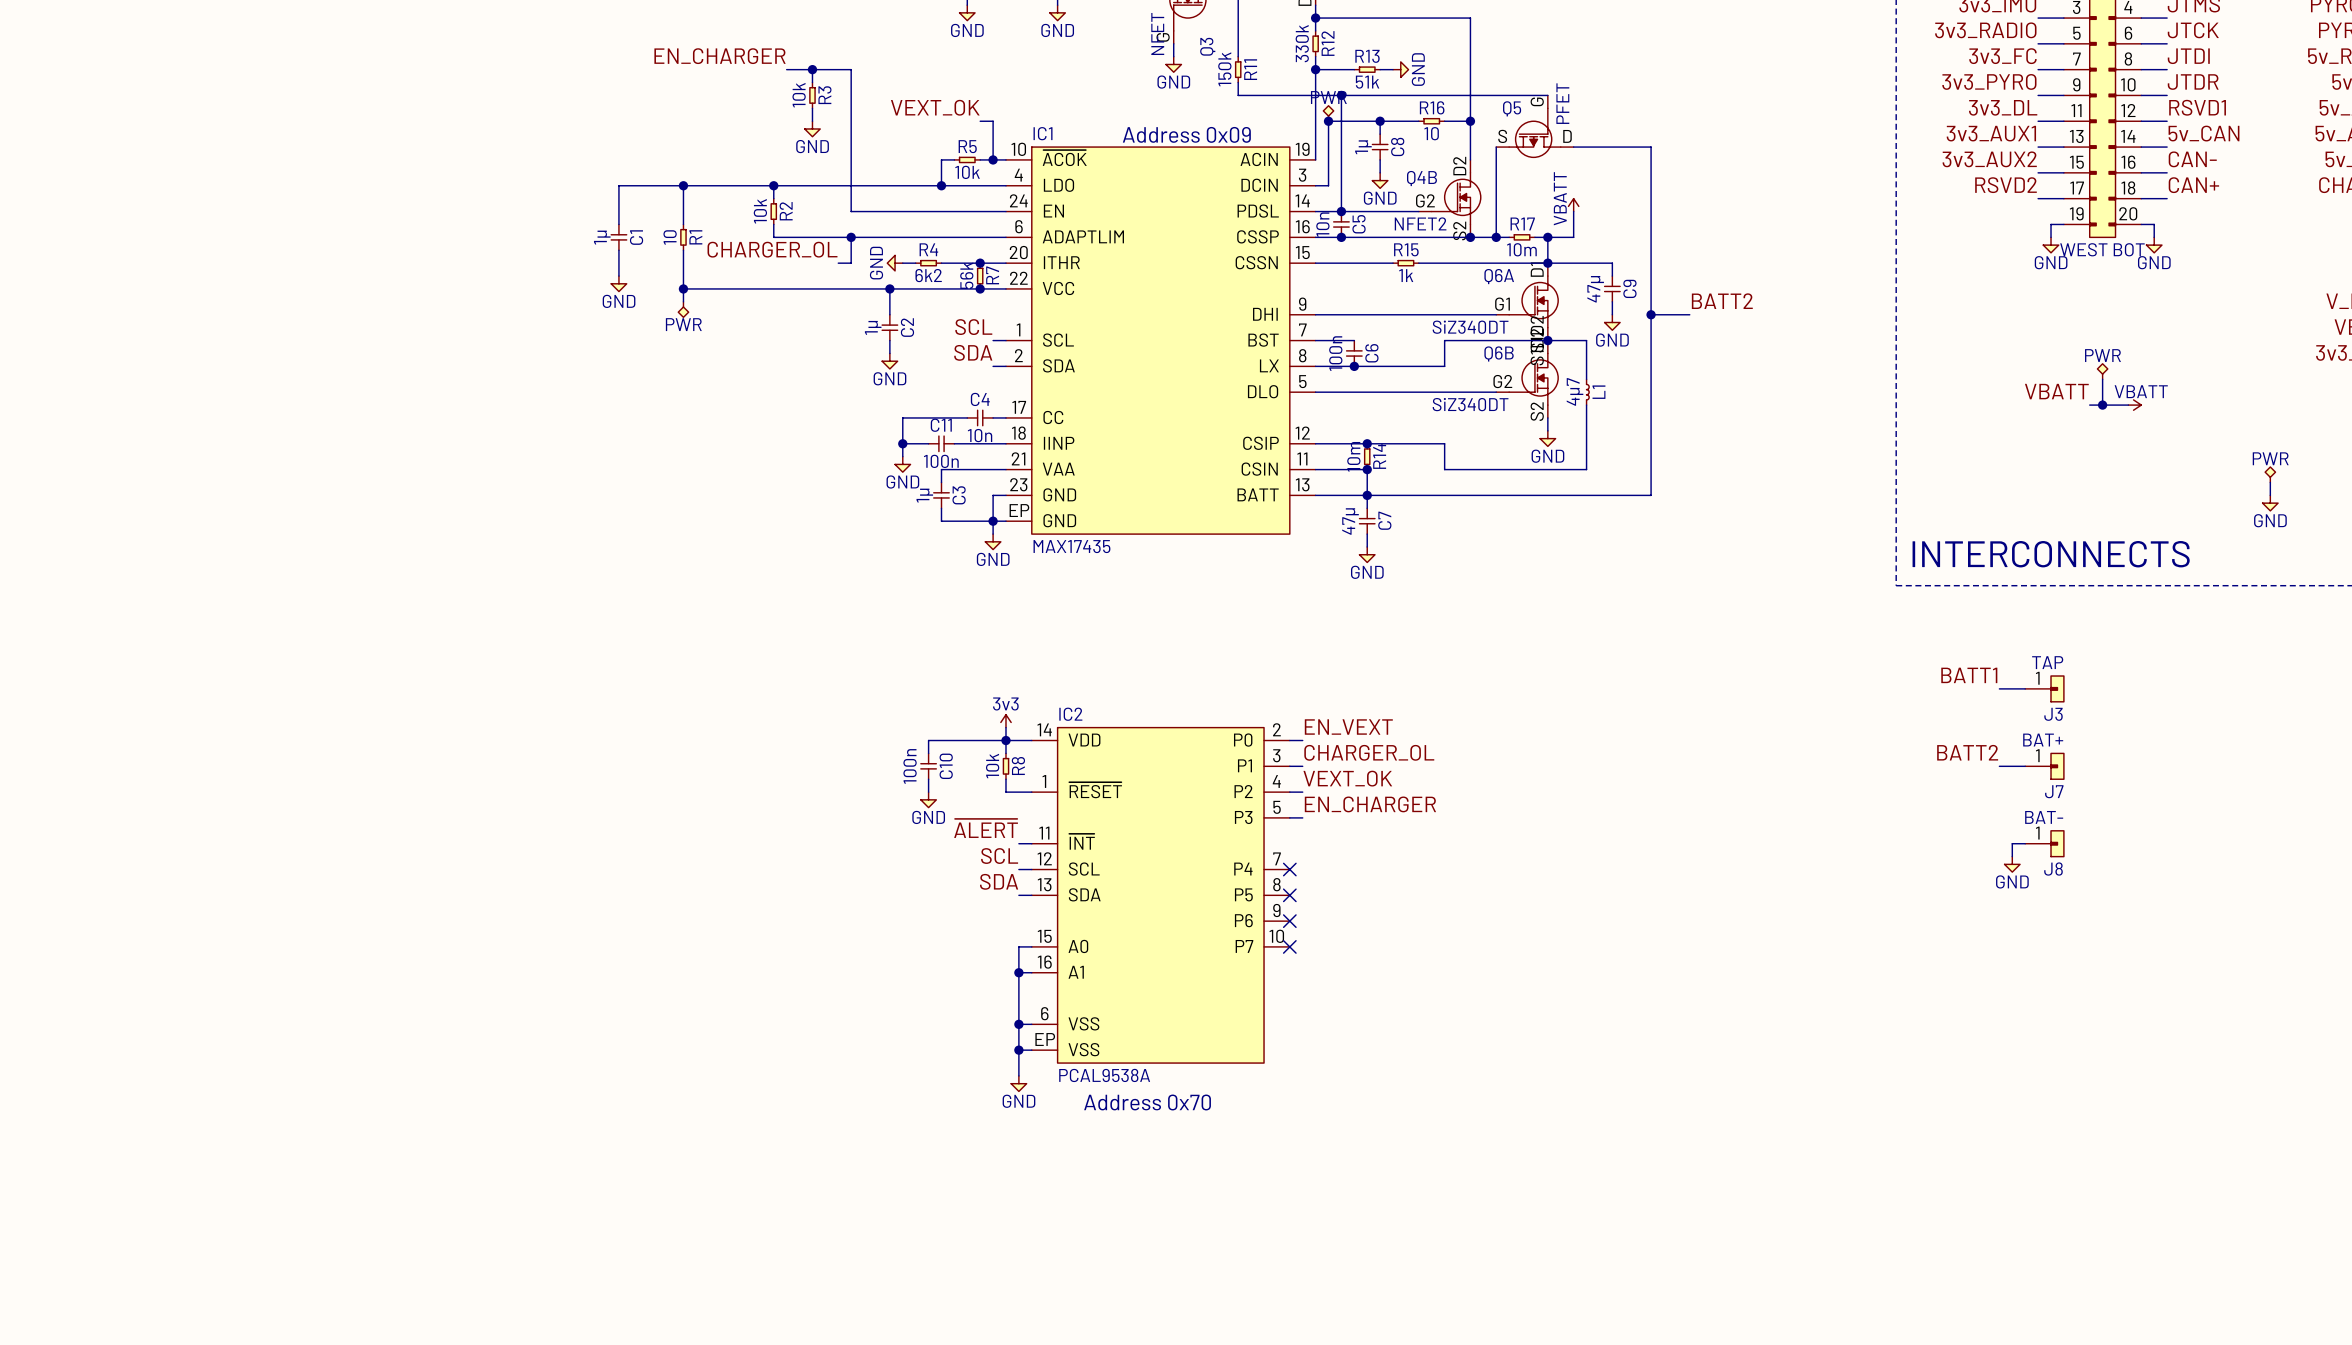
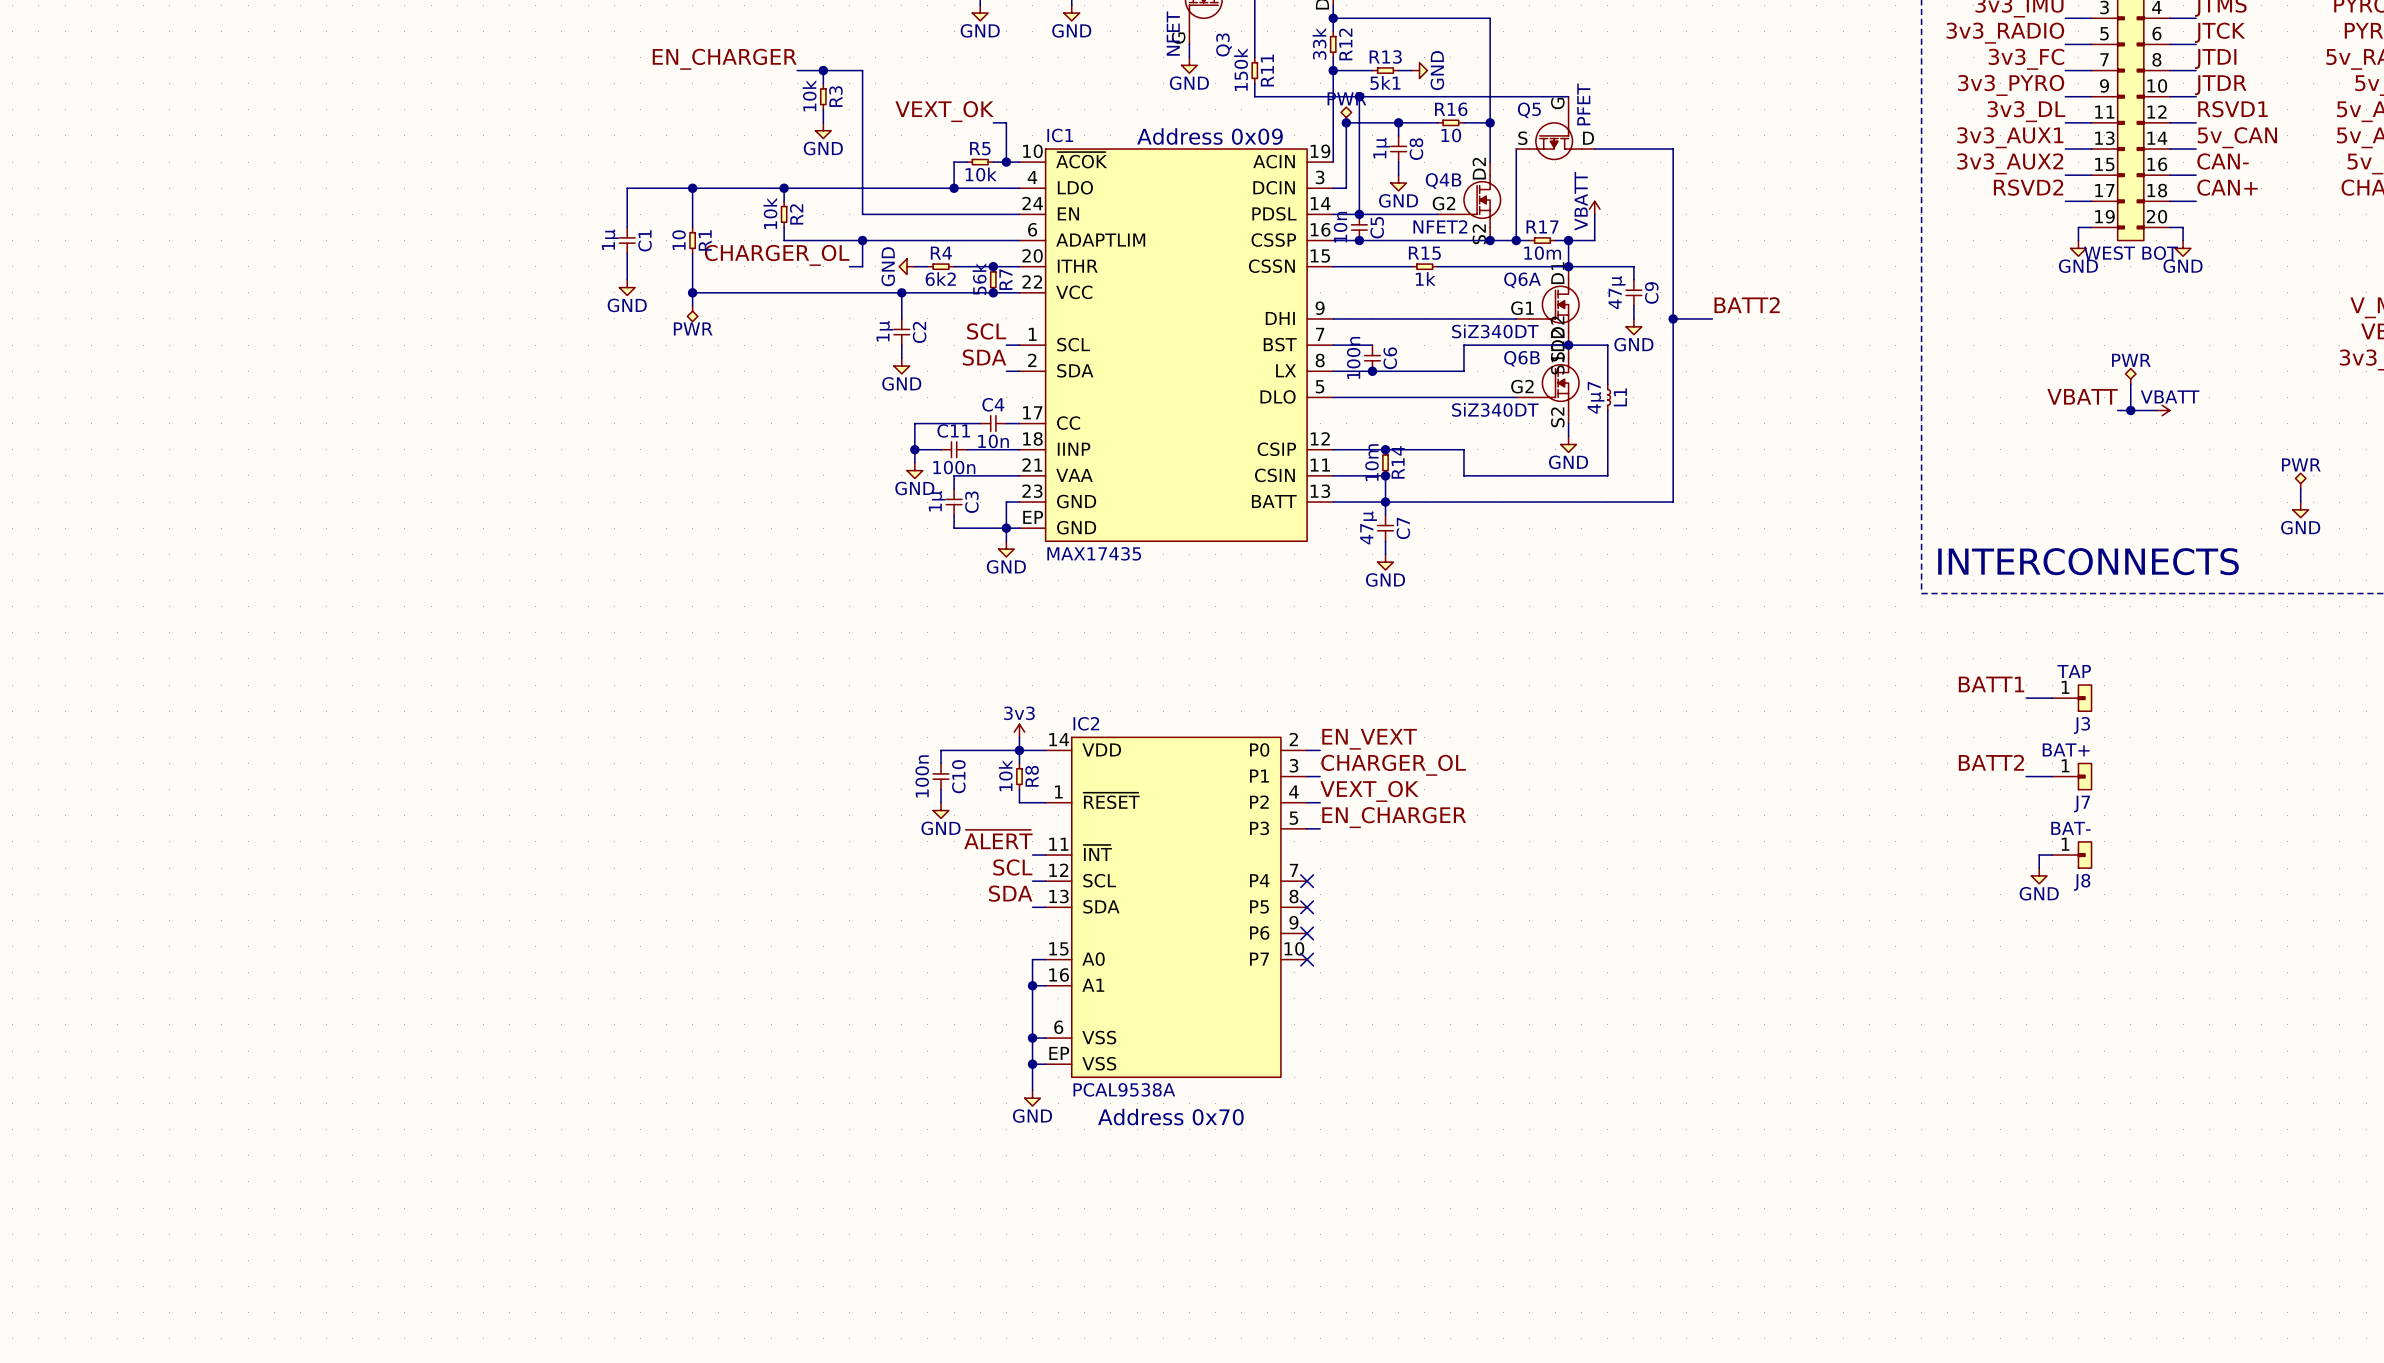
R12 value: 330k (1302, 43) -> 33k (1319, 43)
R13 value: 51k (1367, 82) -> 5k1 (1385, 83)

